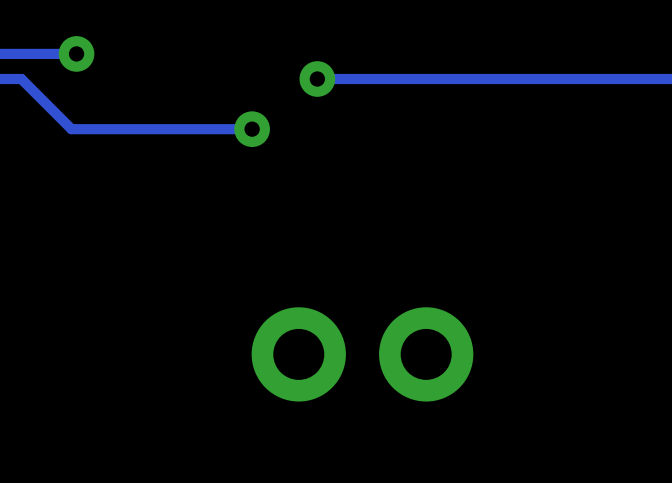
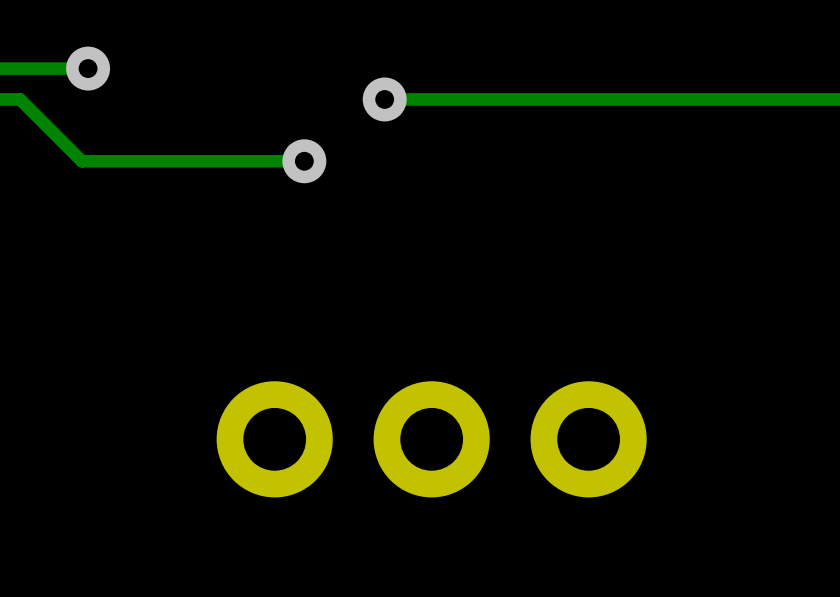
part footprint: [251, 307, 474, 402] -> [216, 381, 647, 498]

